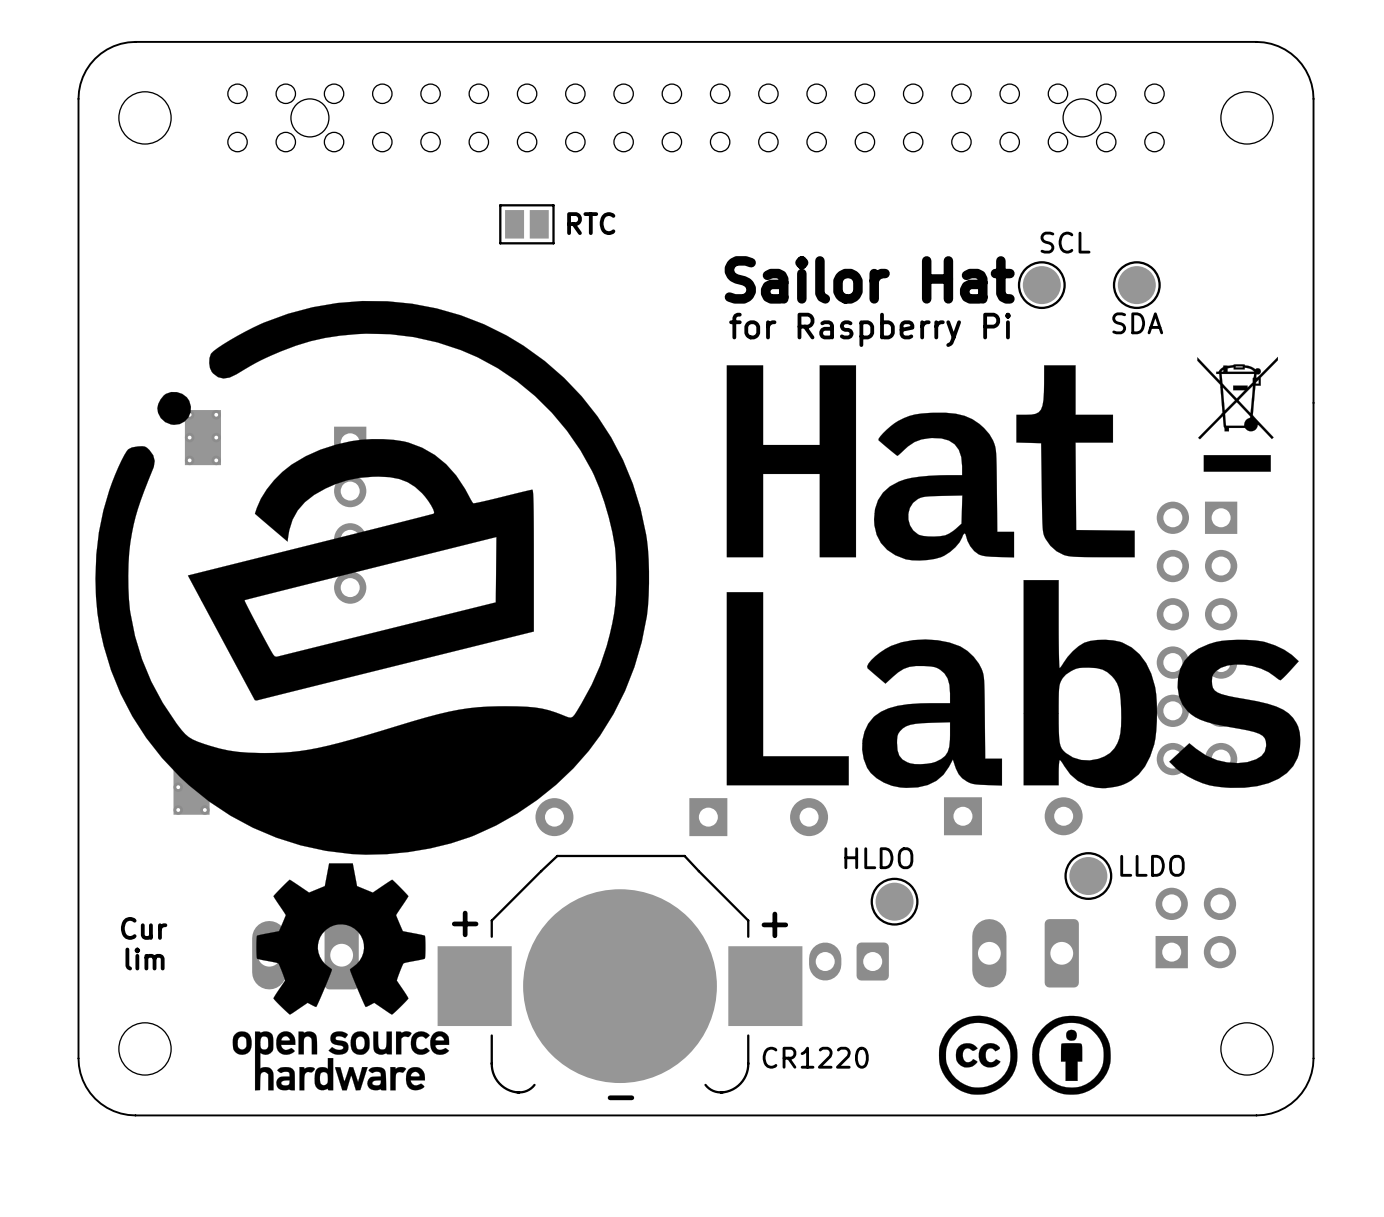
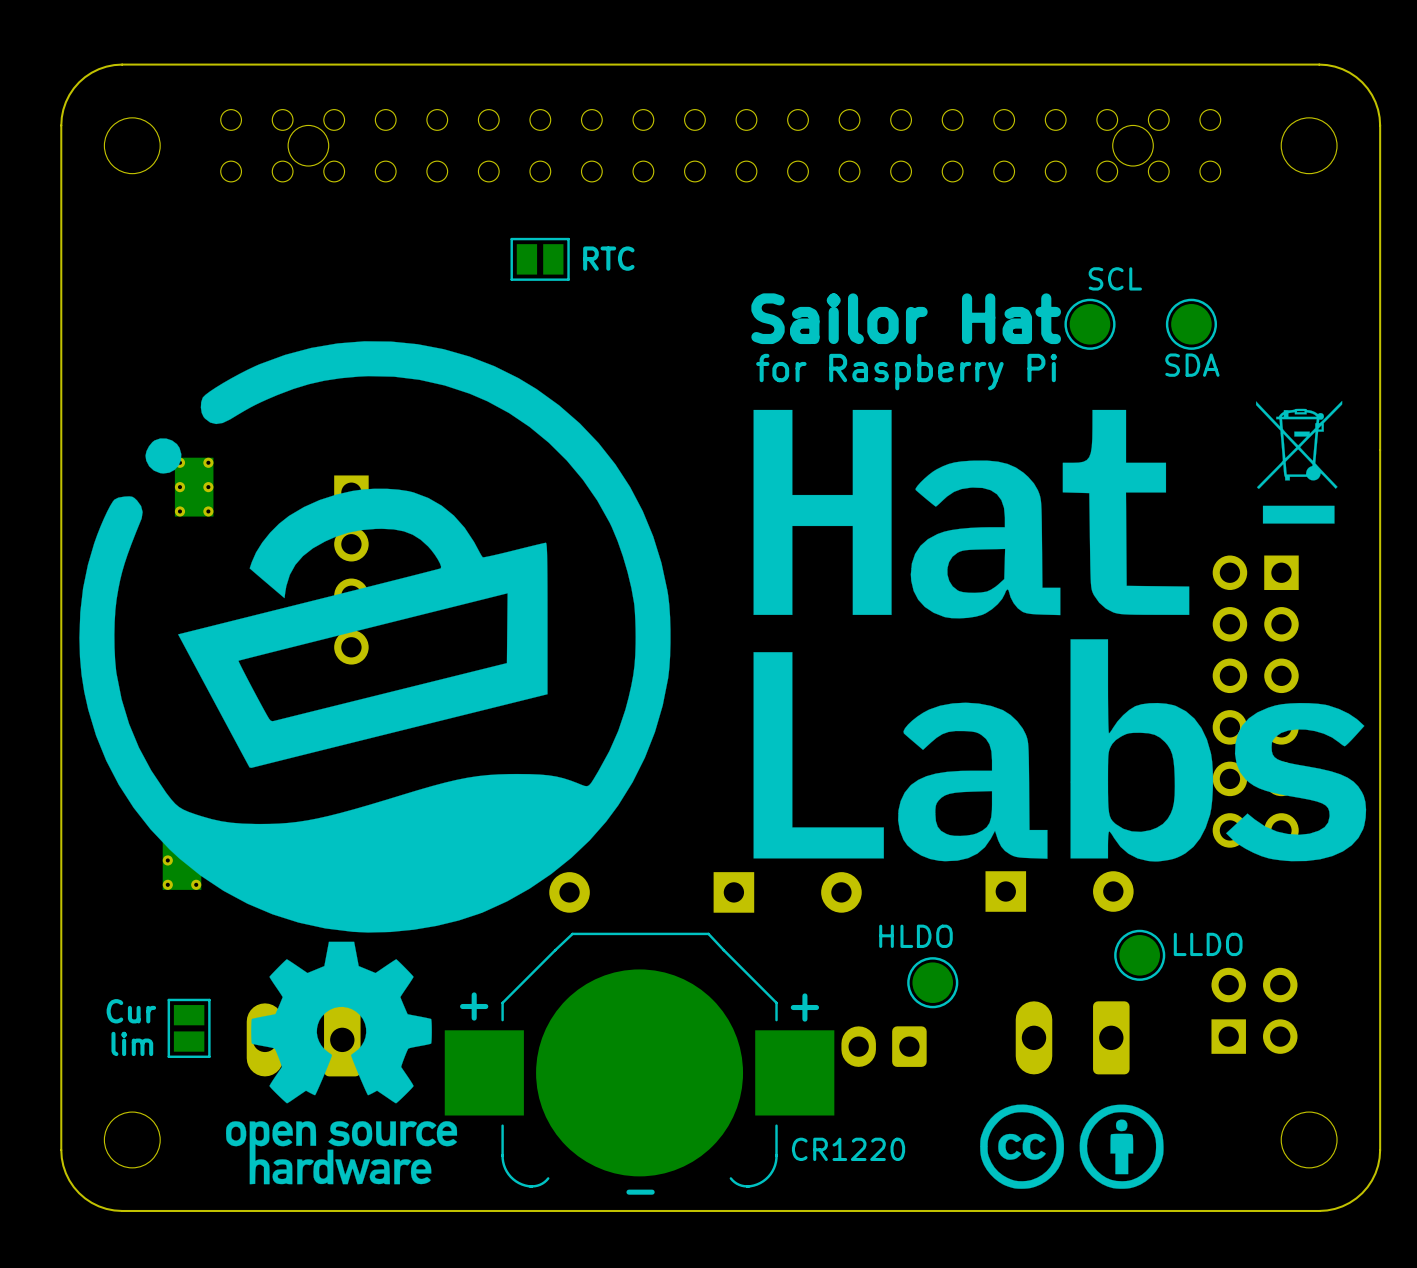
part: none -> (189, 1028)

